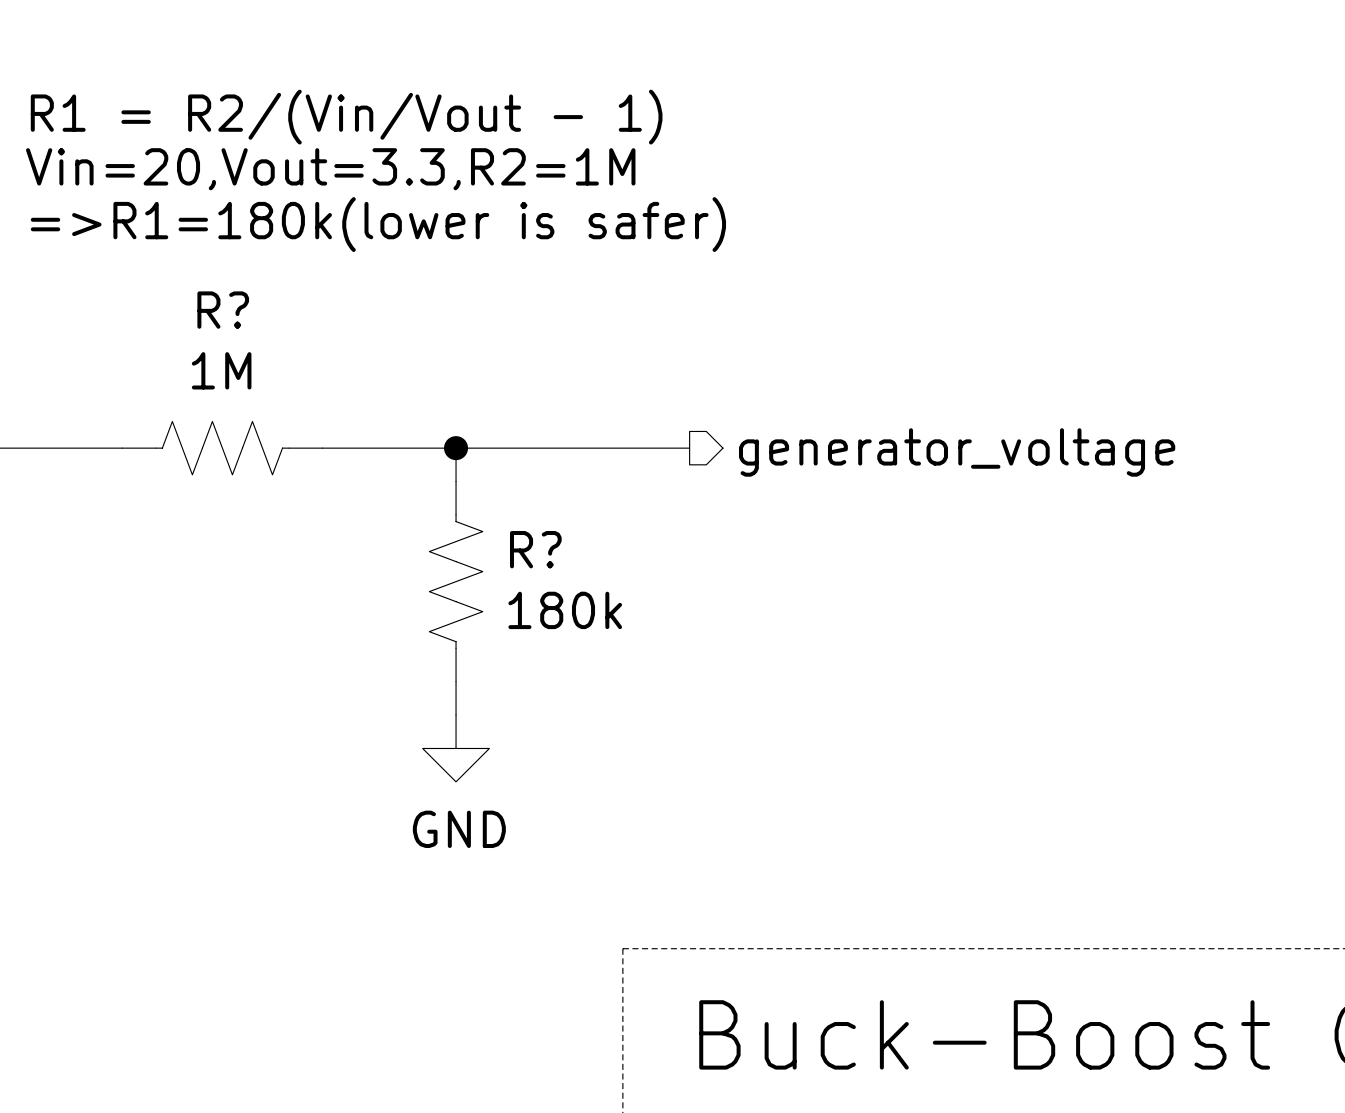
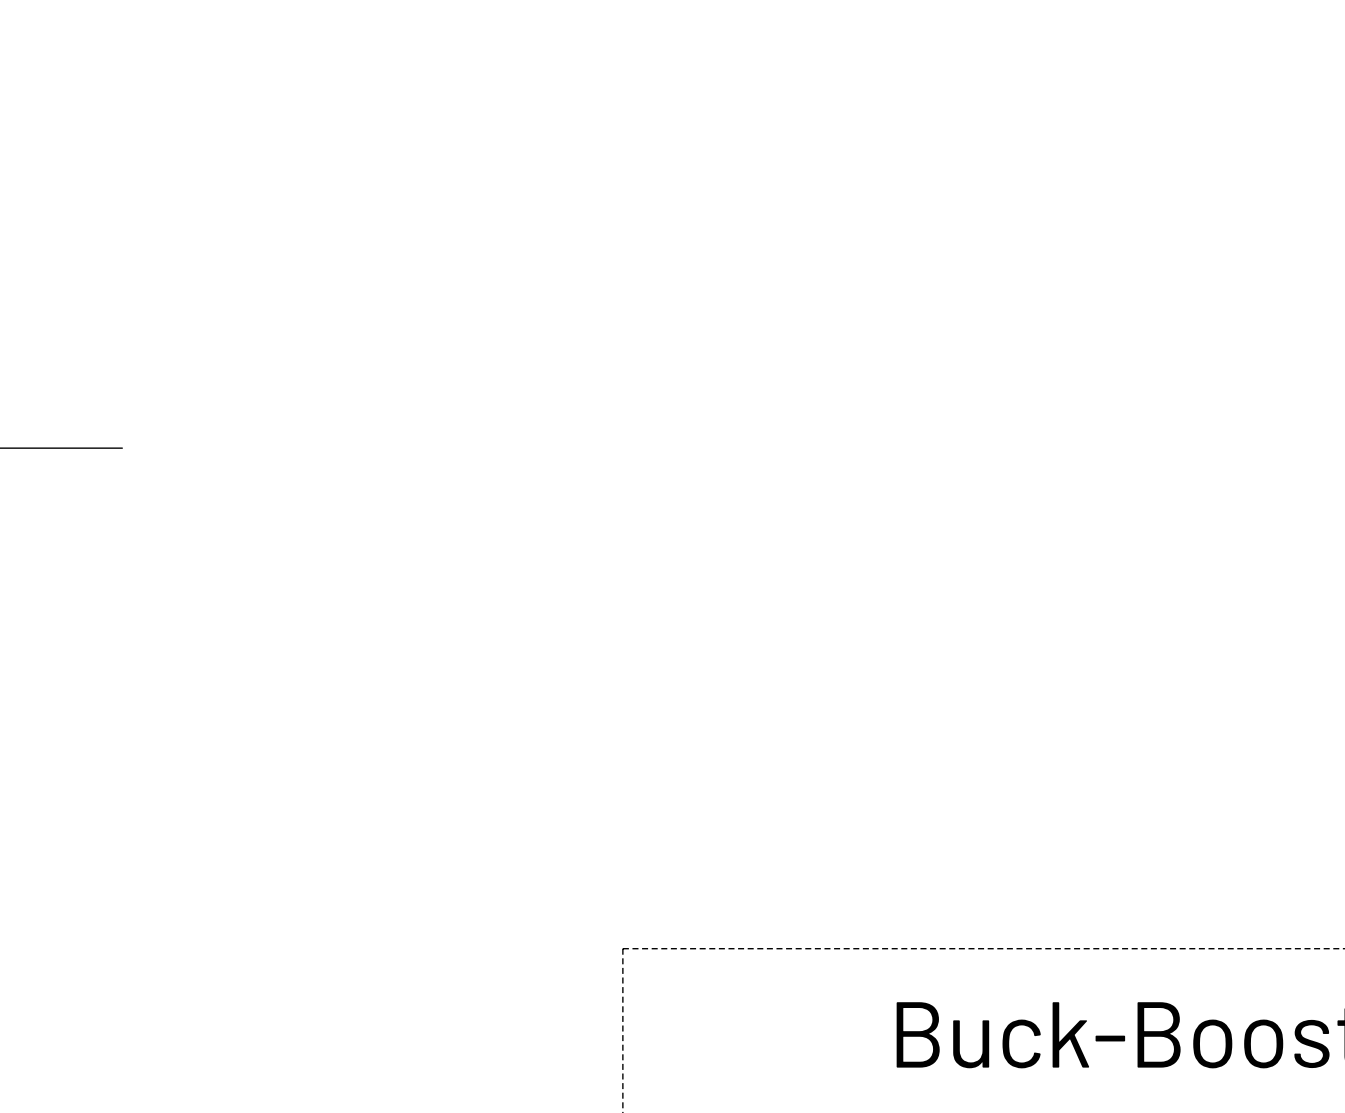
text: R1 = R2/(Vin/Vout - 1) (346, 117) -> none
text: Vin=20,Vout=3.3,R2=1M (330, 169) -> none
text: =>R1=180k(lower is safer) (378, 224) -> none
R?: 1M (222, 448) -> none
wire: (322, 448) (689, 448) -> none
wire: (456, 448) (456, 481) -> none
junction: (456, 448) -> none
hierarchical label: generator_voltage (957, 452) -> none
R?: 180k (456, 581) -> none
wire: (456, 681) (456, 715) -> none
power symbol: GND (456, 748) -> none

